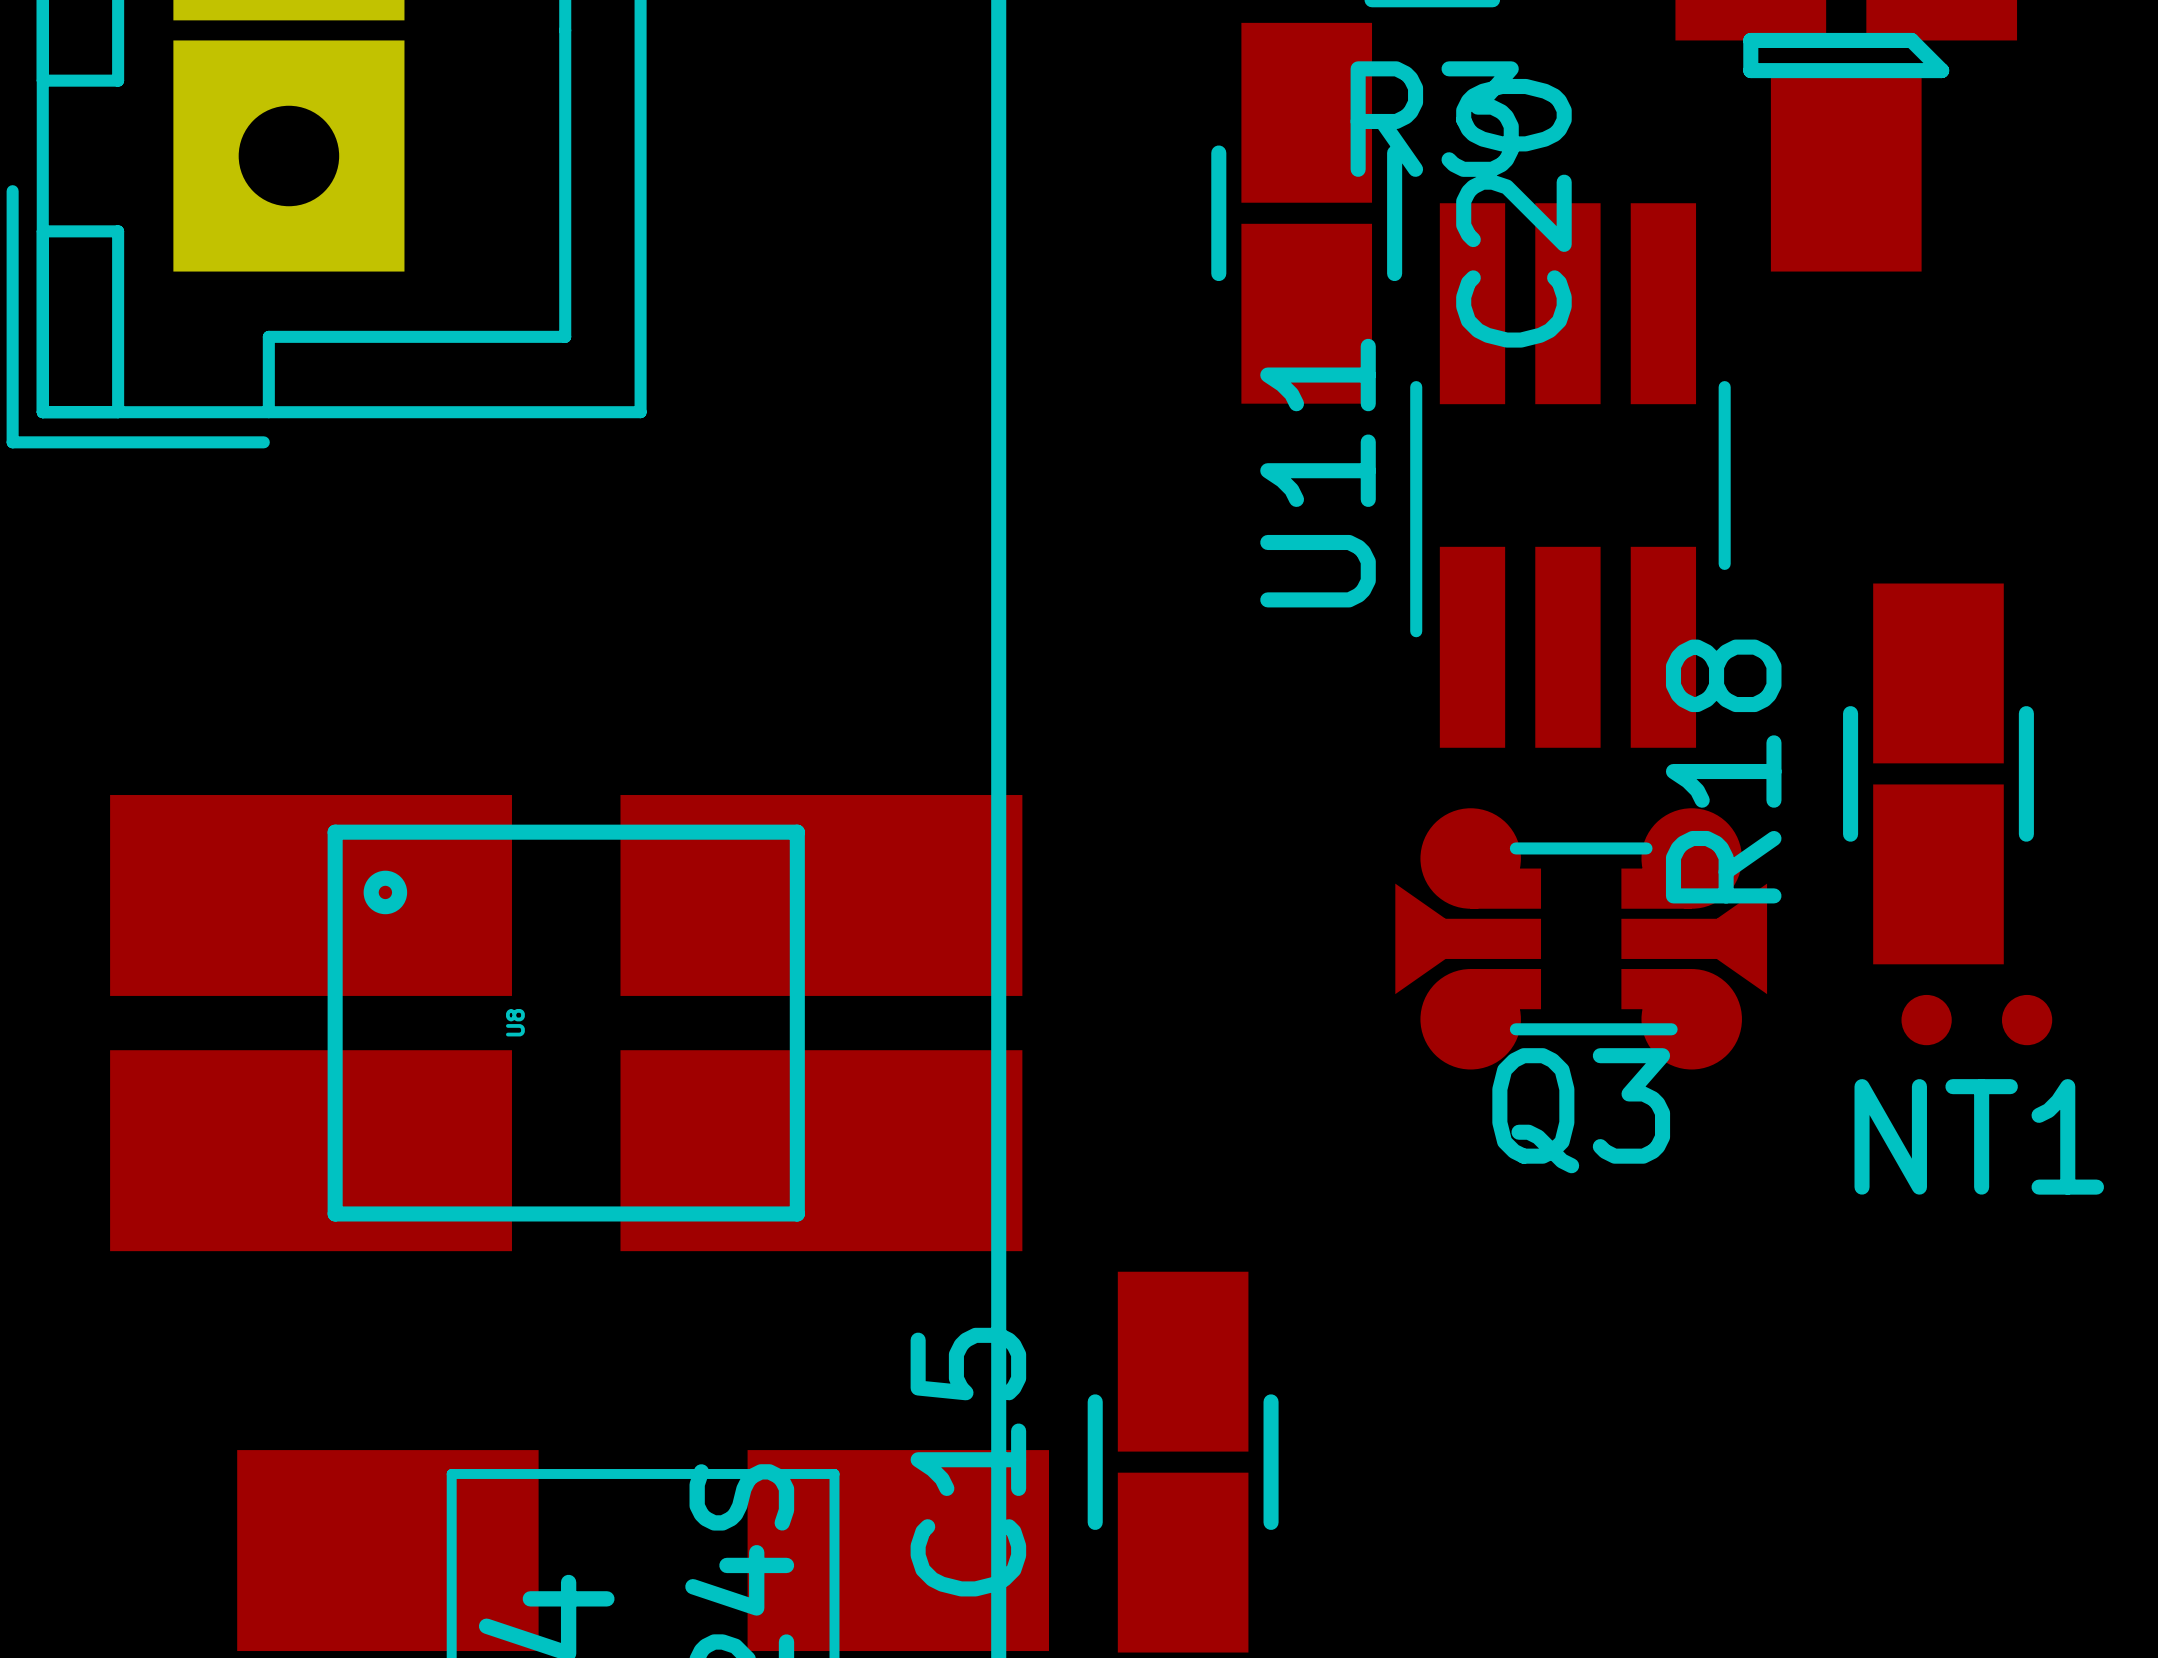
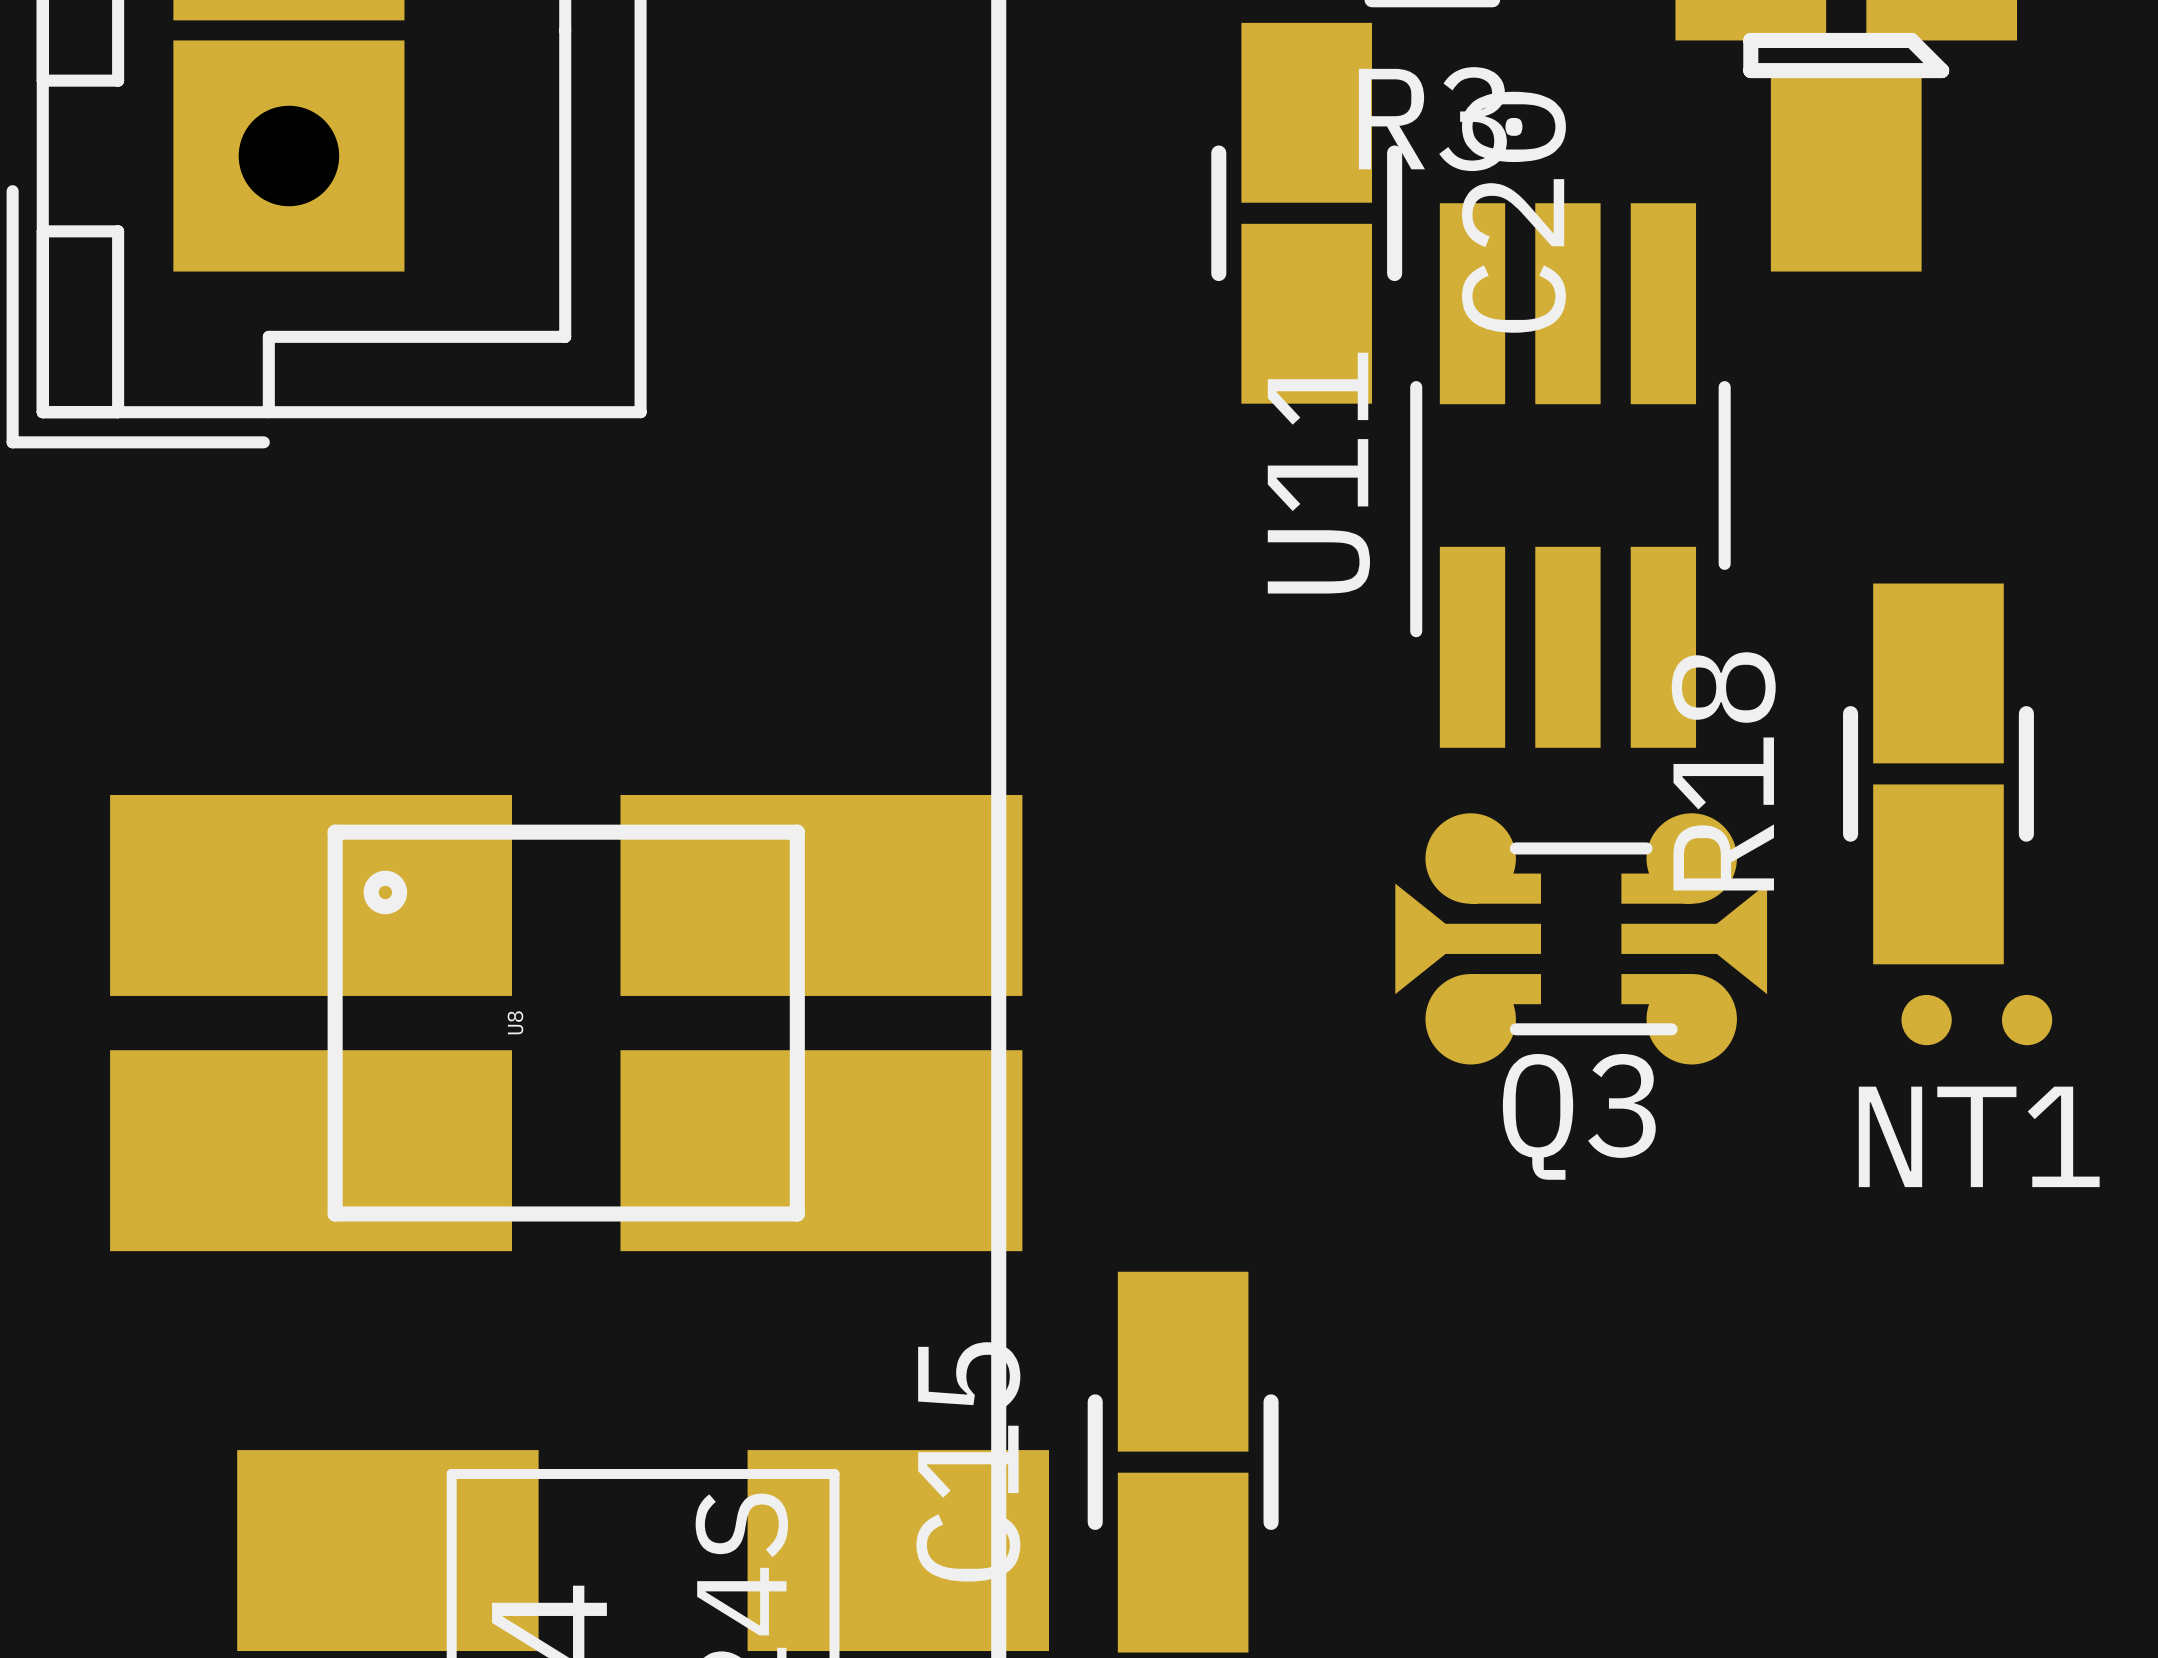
Q3 footprint: [1395, 808, 1768, 1070] -> [1395, 813, 1768, 1065]

